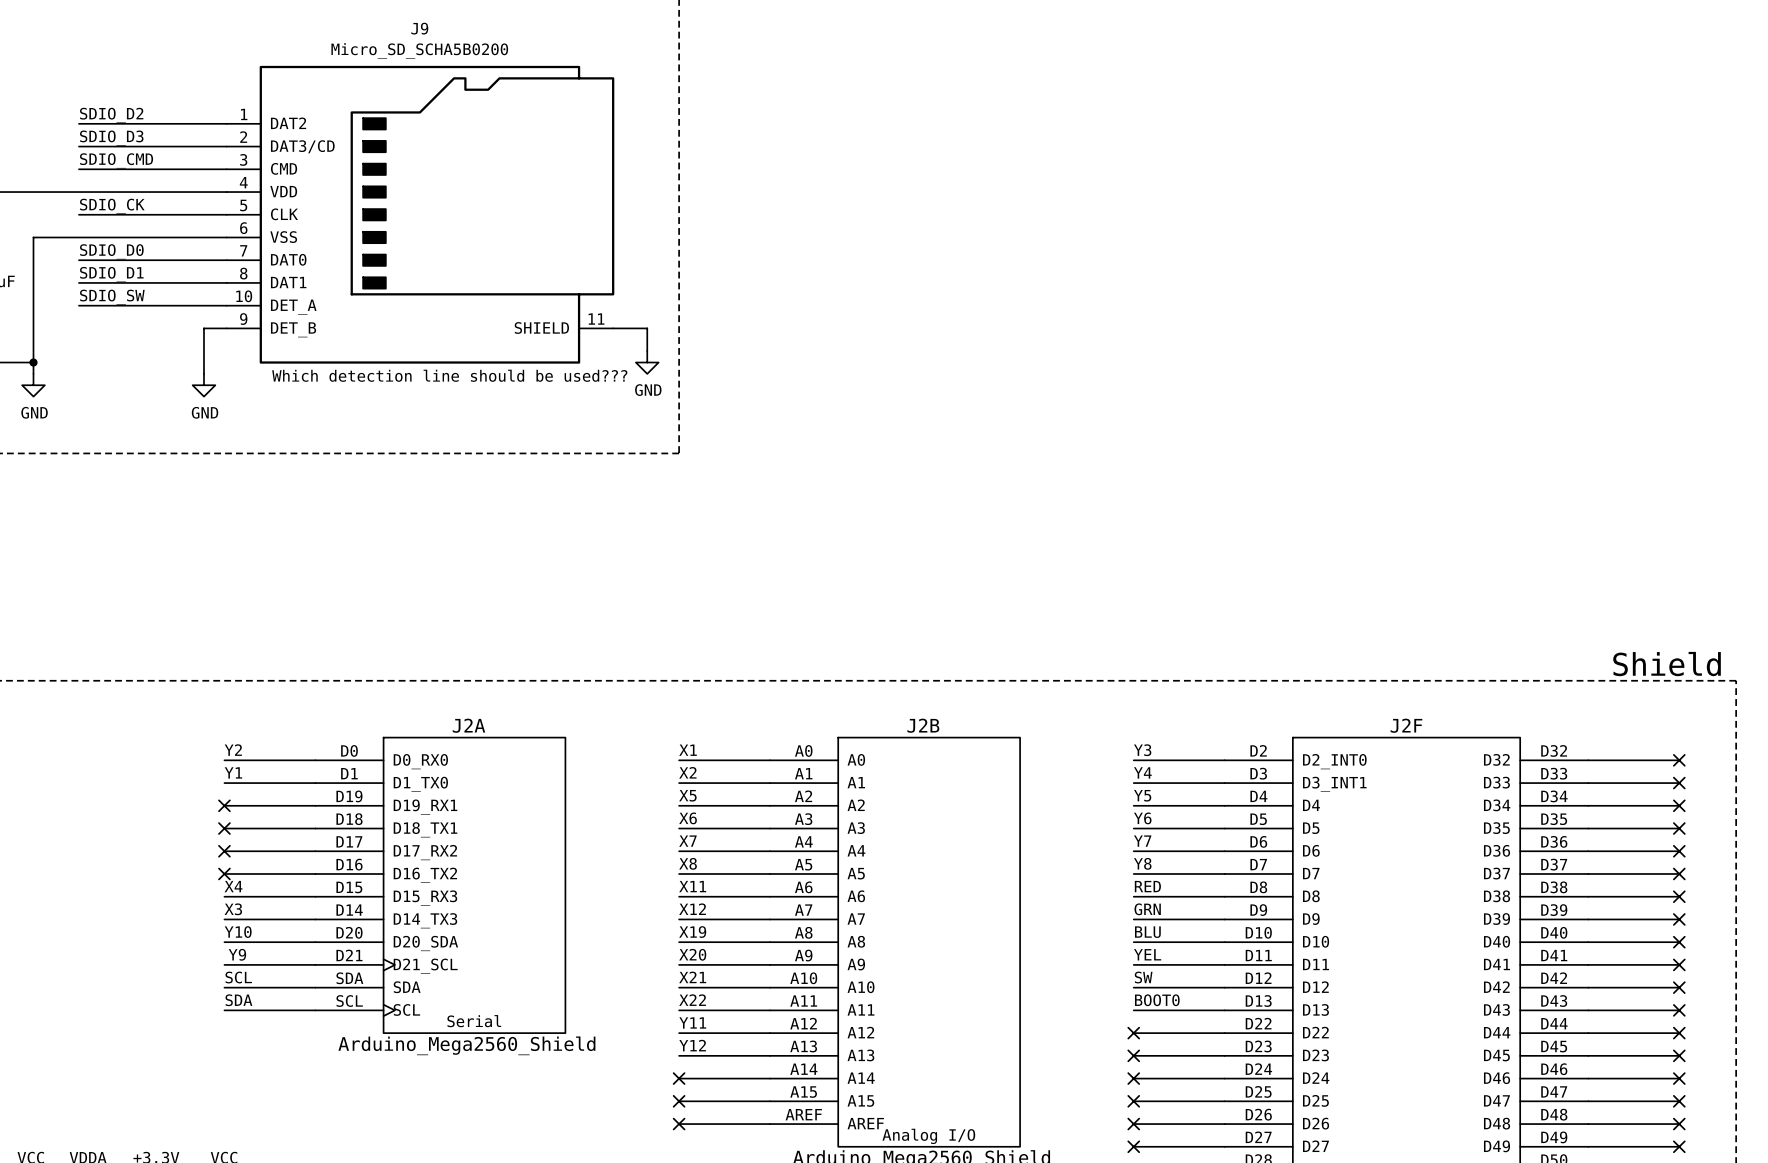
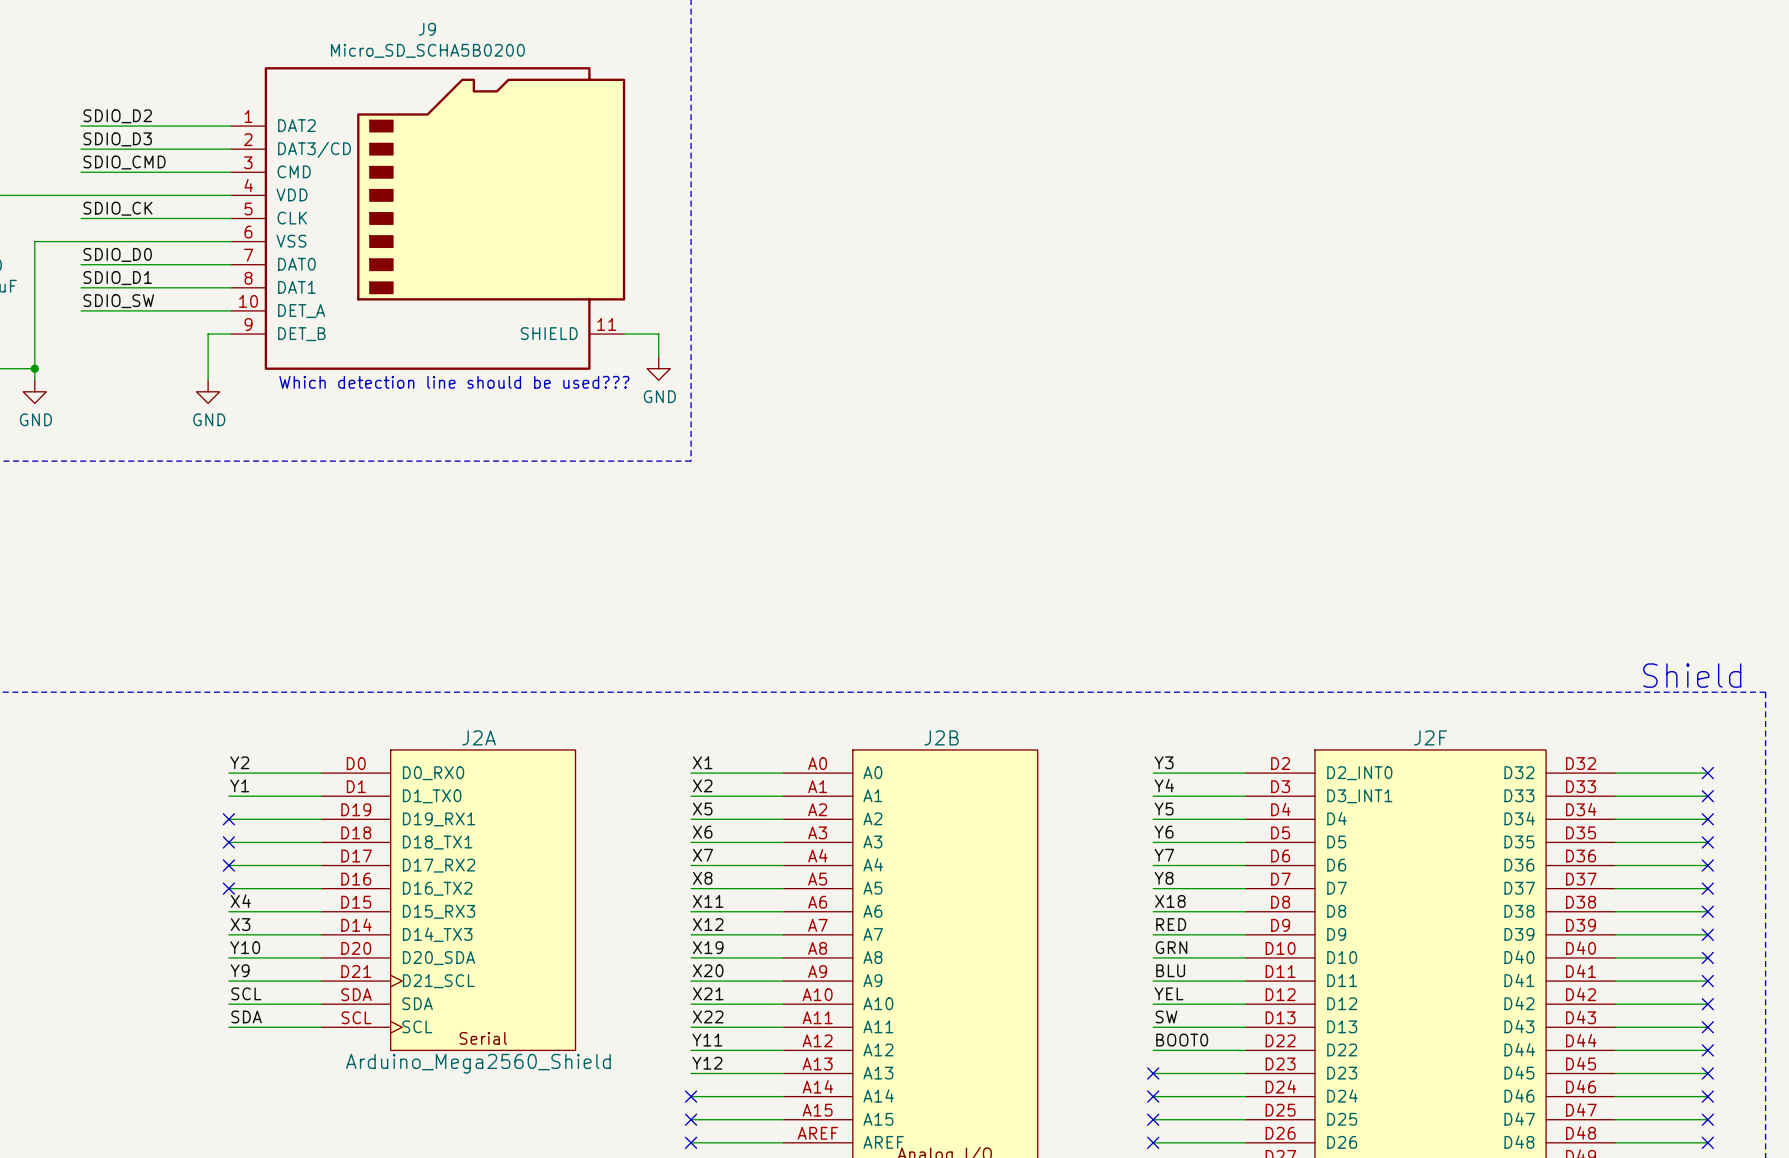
label: RED (1147, 886) -> X18 (1170, 901)
label: GRN (1147, 909) -> RED (1171, 924)
label: BLU (1147, 932) -> GRN (1171, 947)
label: YEL (1147, 954) -> BLU (1170, 970)
label: SW (1143, 977) -> YEL (1169, 993)
label: BOOT0 (1157, 1000) -> SW (1166, 1016)
label: none -> BOOT0 (1182, 1040)
no-connect mark: (1133, 1033) -> none

